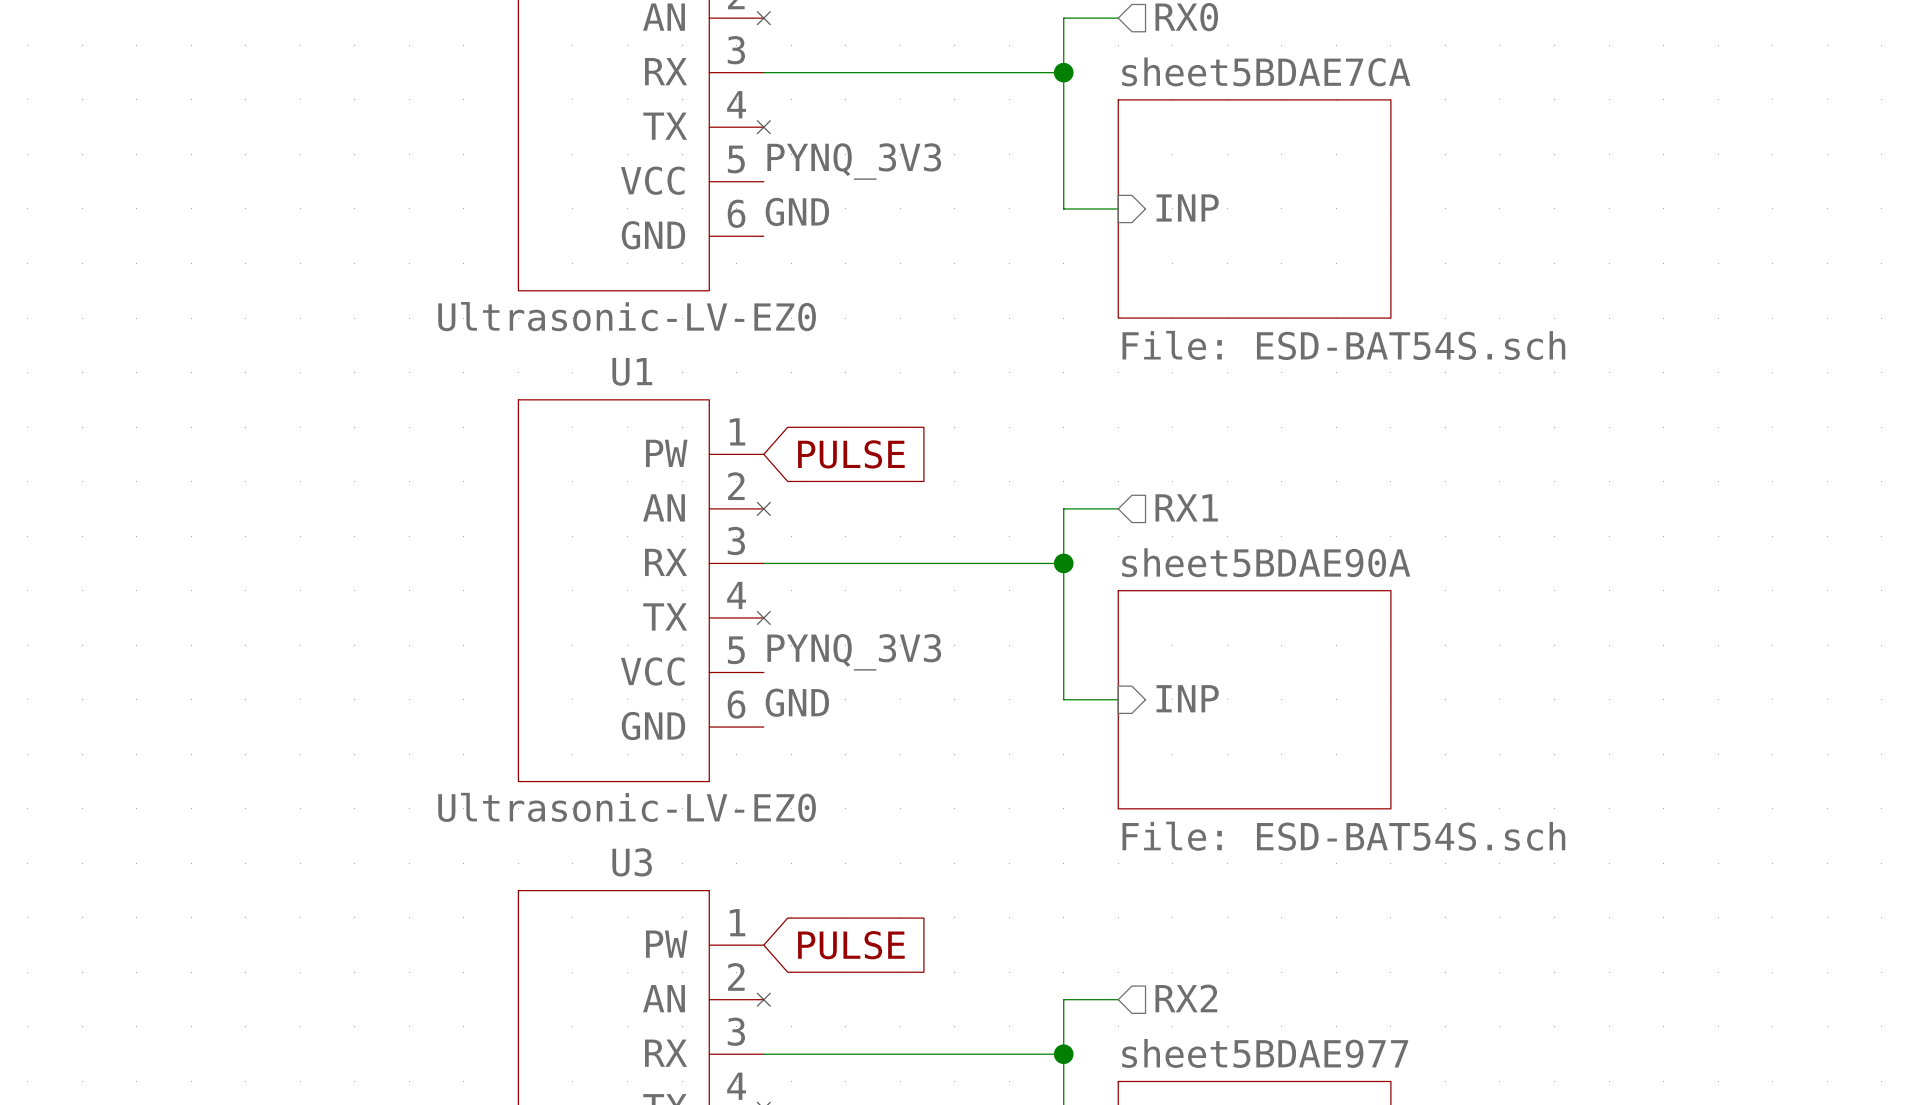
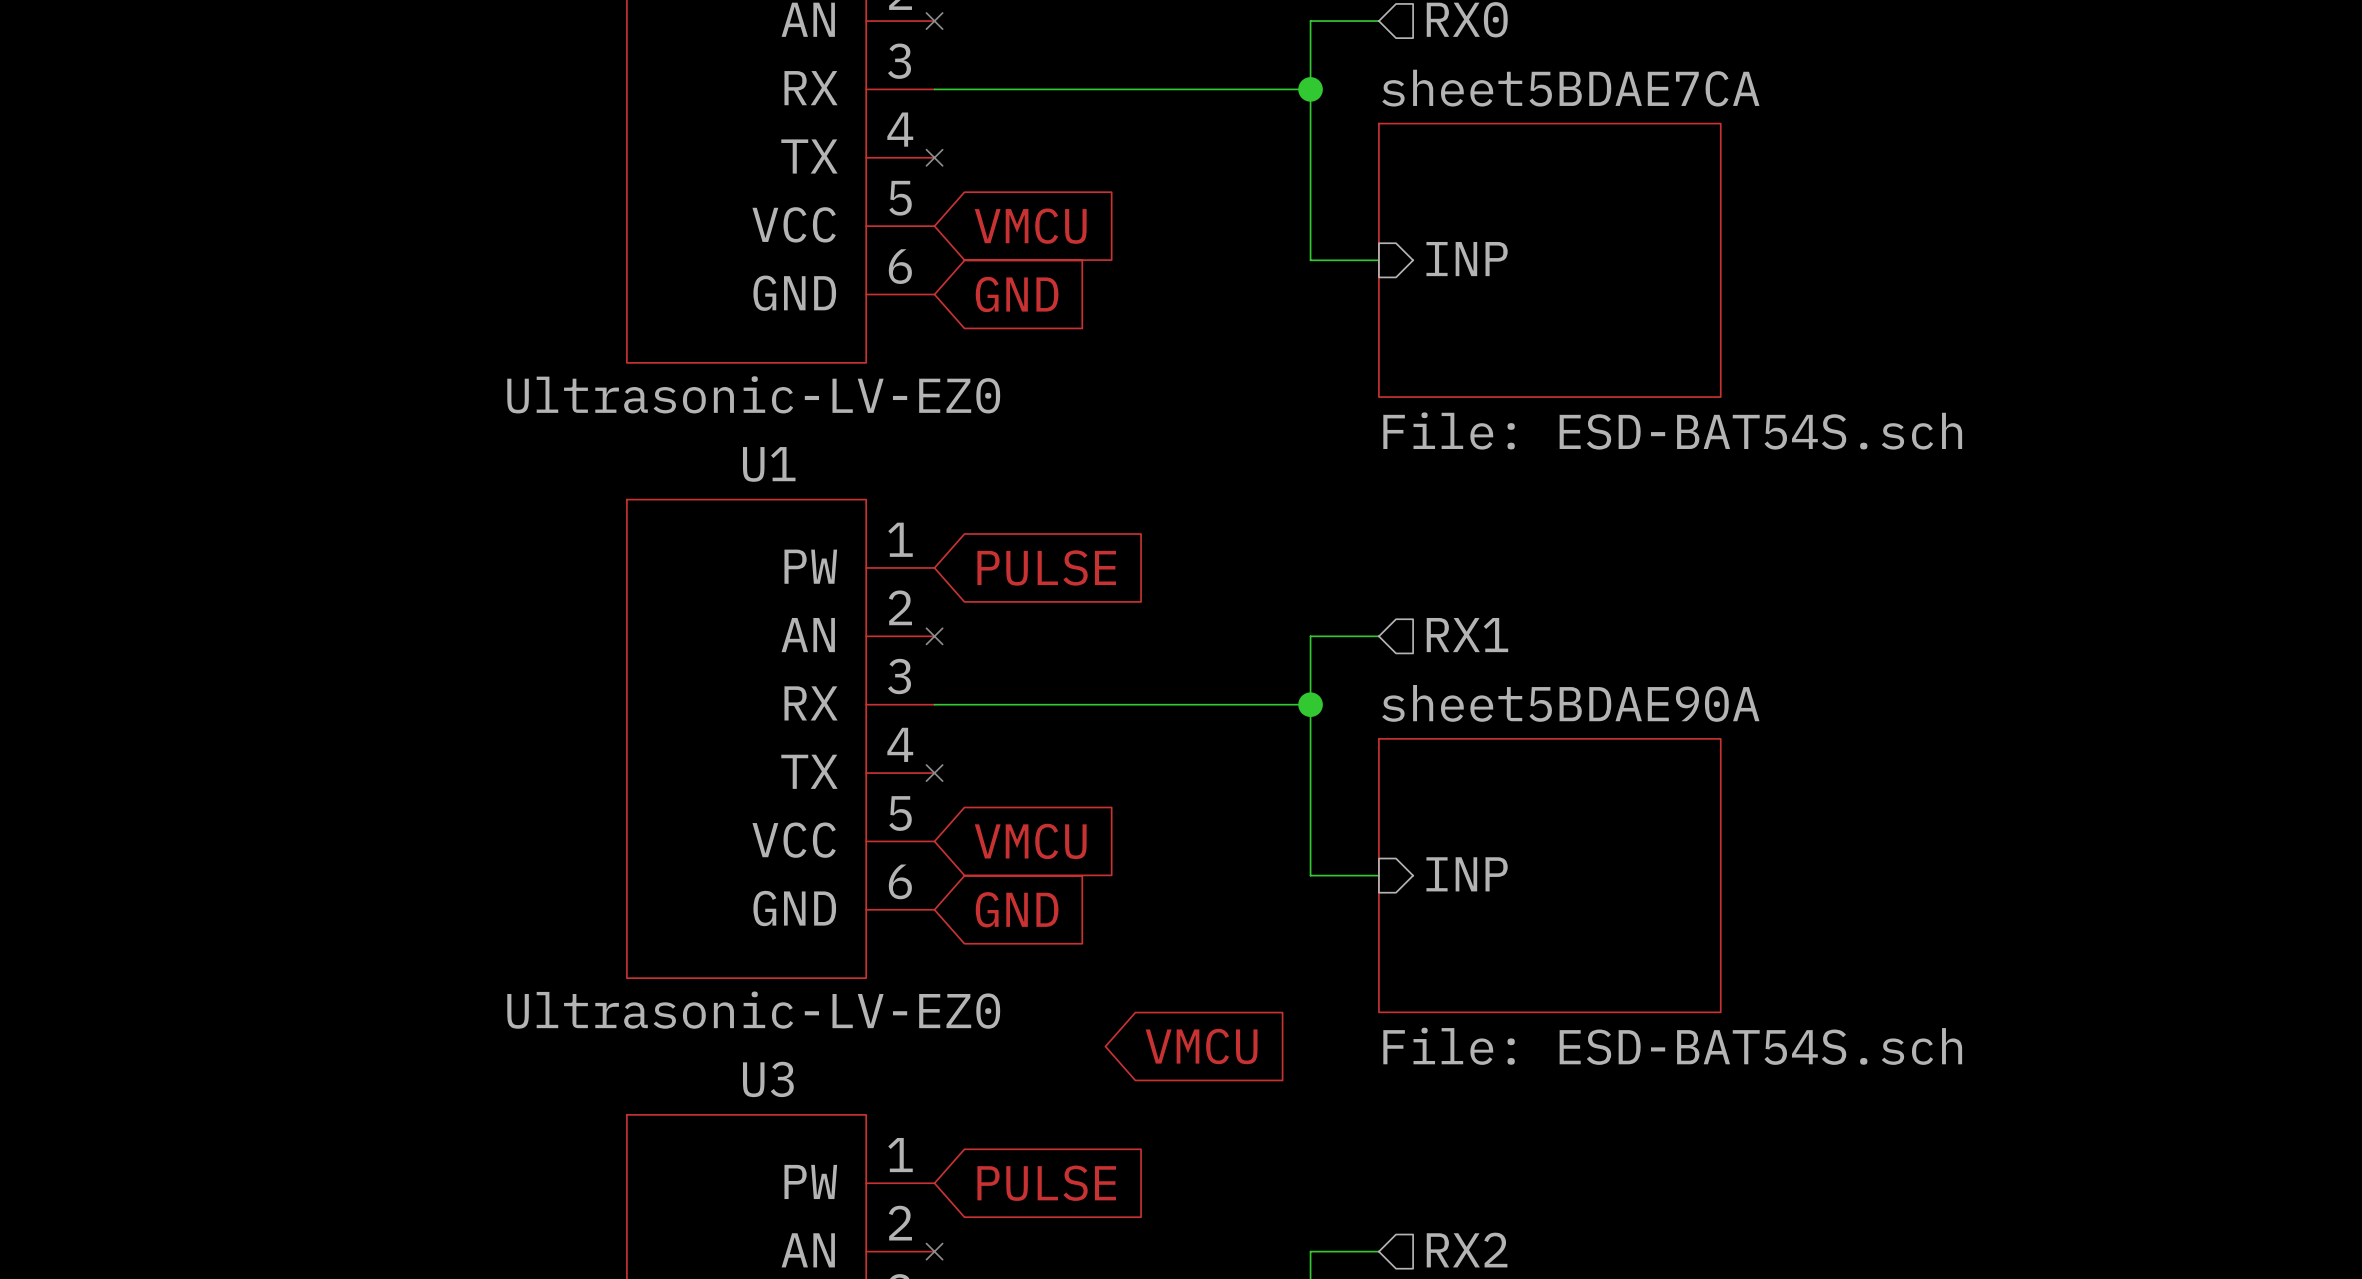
label: PYNQ_3V3 (854, 161) -> none
global label: none -> VMCU (1030, 226)
label: GND (797, 211) -> none
global label: none -> GND (1017, 294)
label: PYNQ_3V3 (854, 652) -> none
global label: none -> VMCU (1030, 841)
label: GND (797, 702) -> none
global label: none -> GND (1017, 909)
global label: none -> VMCU (1201, 1046)

